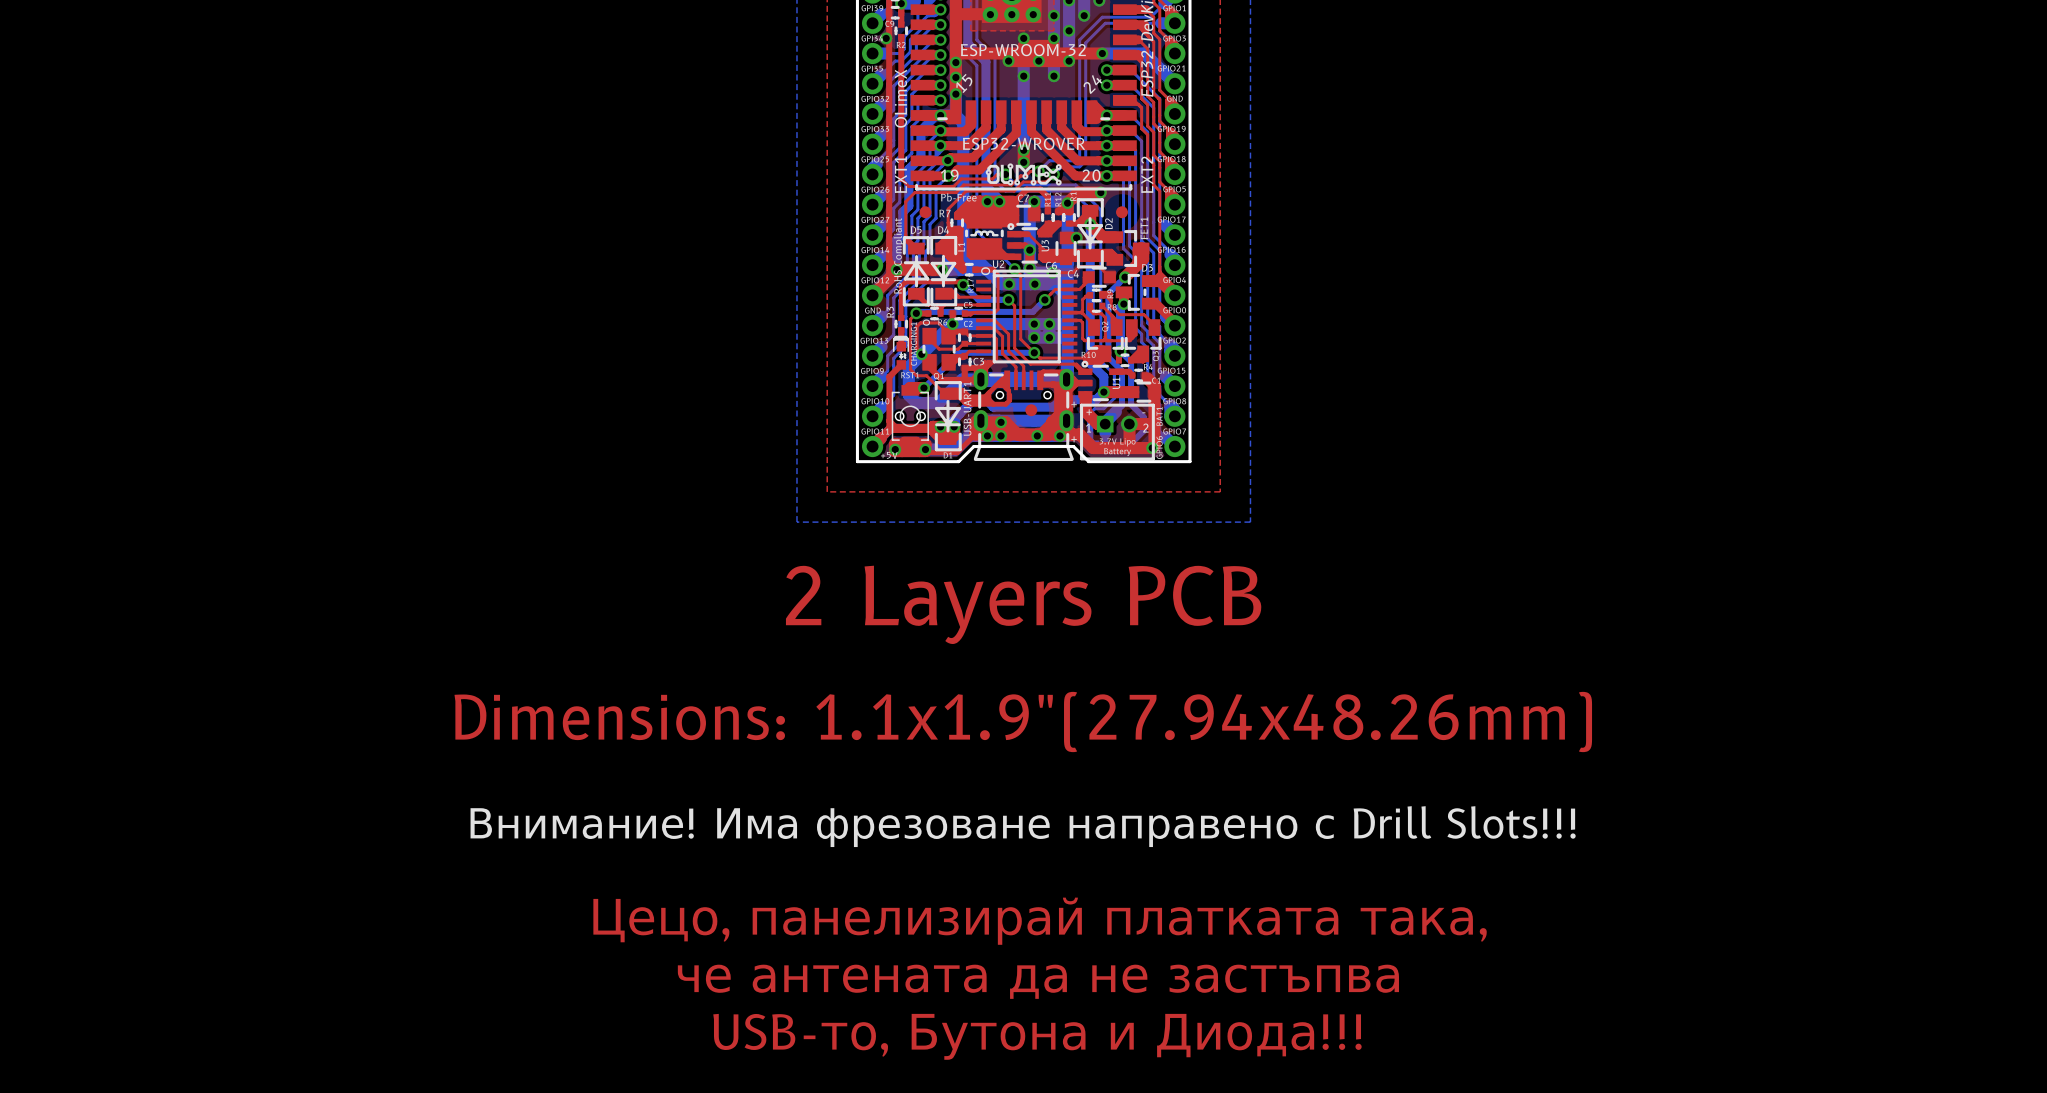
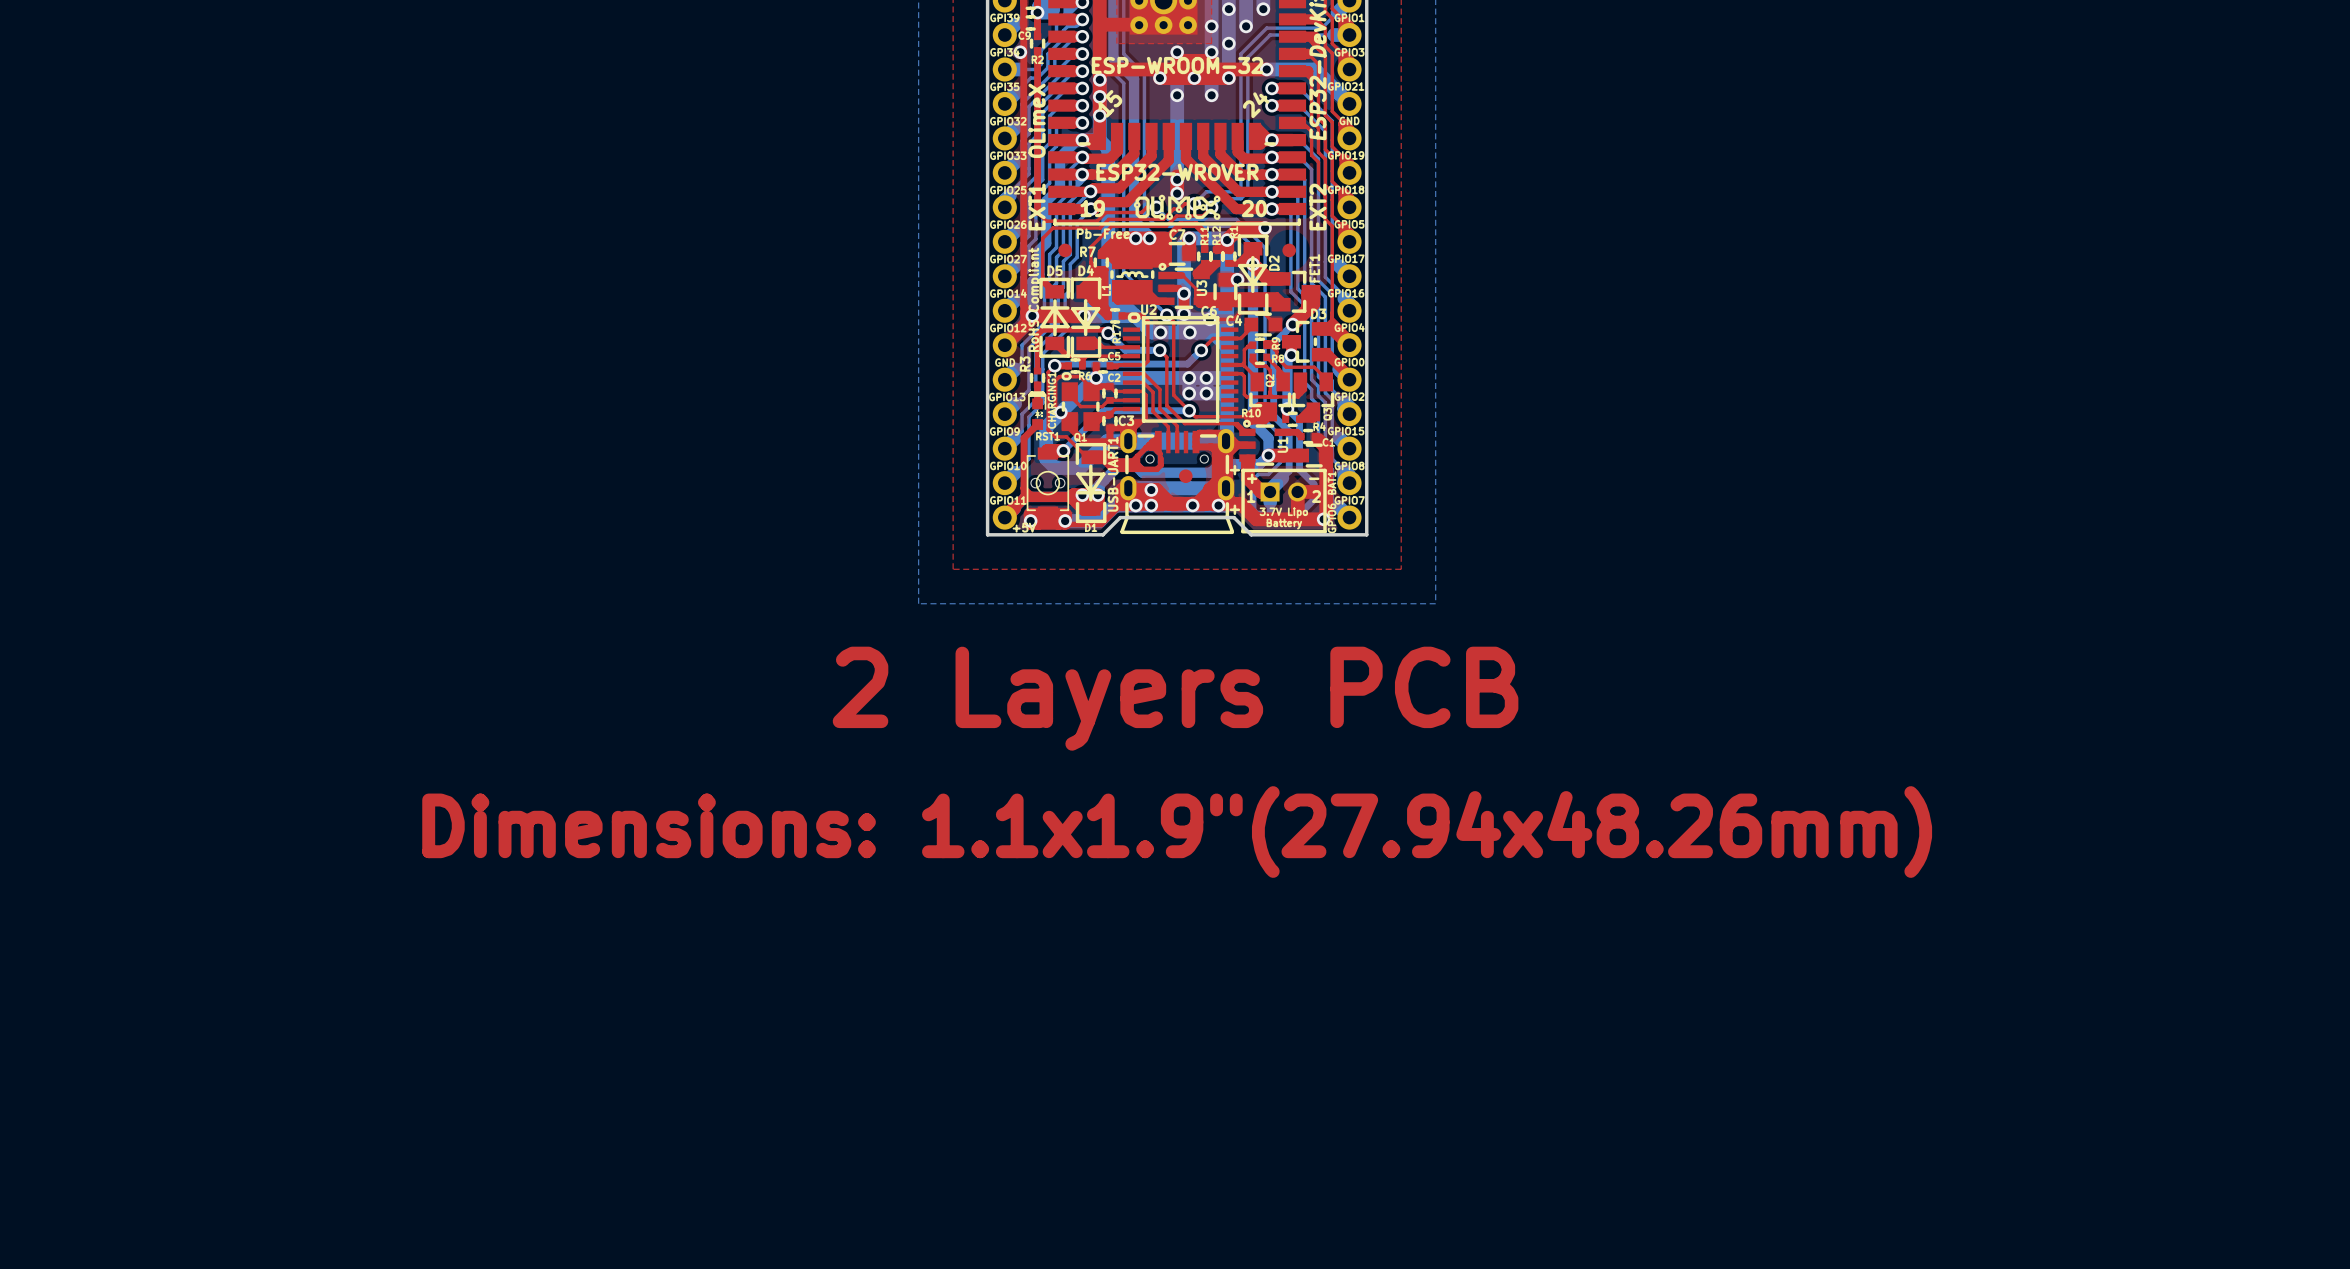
USB-UART1 text: Внимание! Има фрезоване направено с Drill Slots!!! (1023, 826) -> none
text: Цецо, панелизирай платката така, (1040, 921) -> none
text: че антената да не застъпва (1038, 981) -> none
text: USB-то, Бутона и Диода!!! (1037, 1036) -> none

